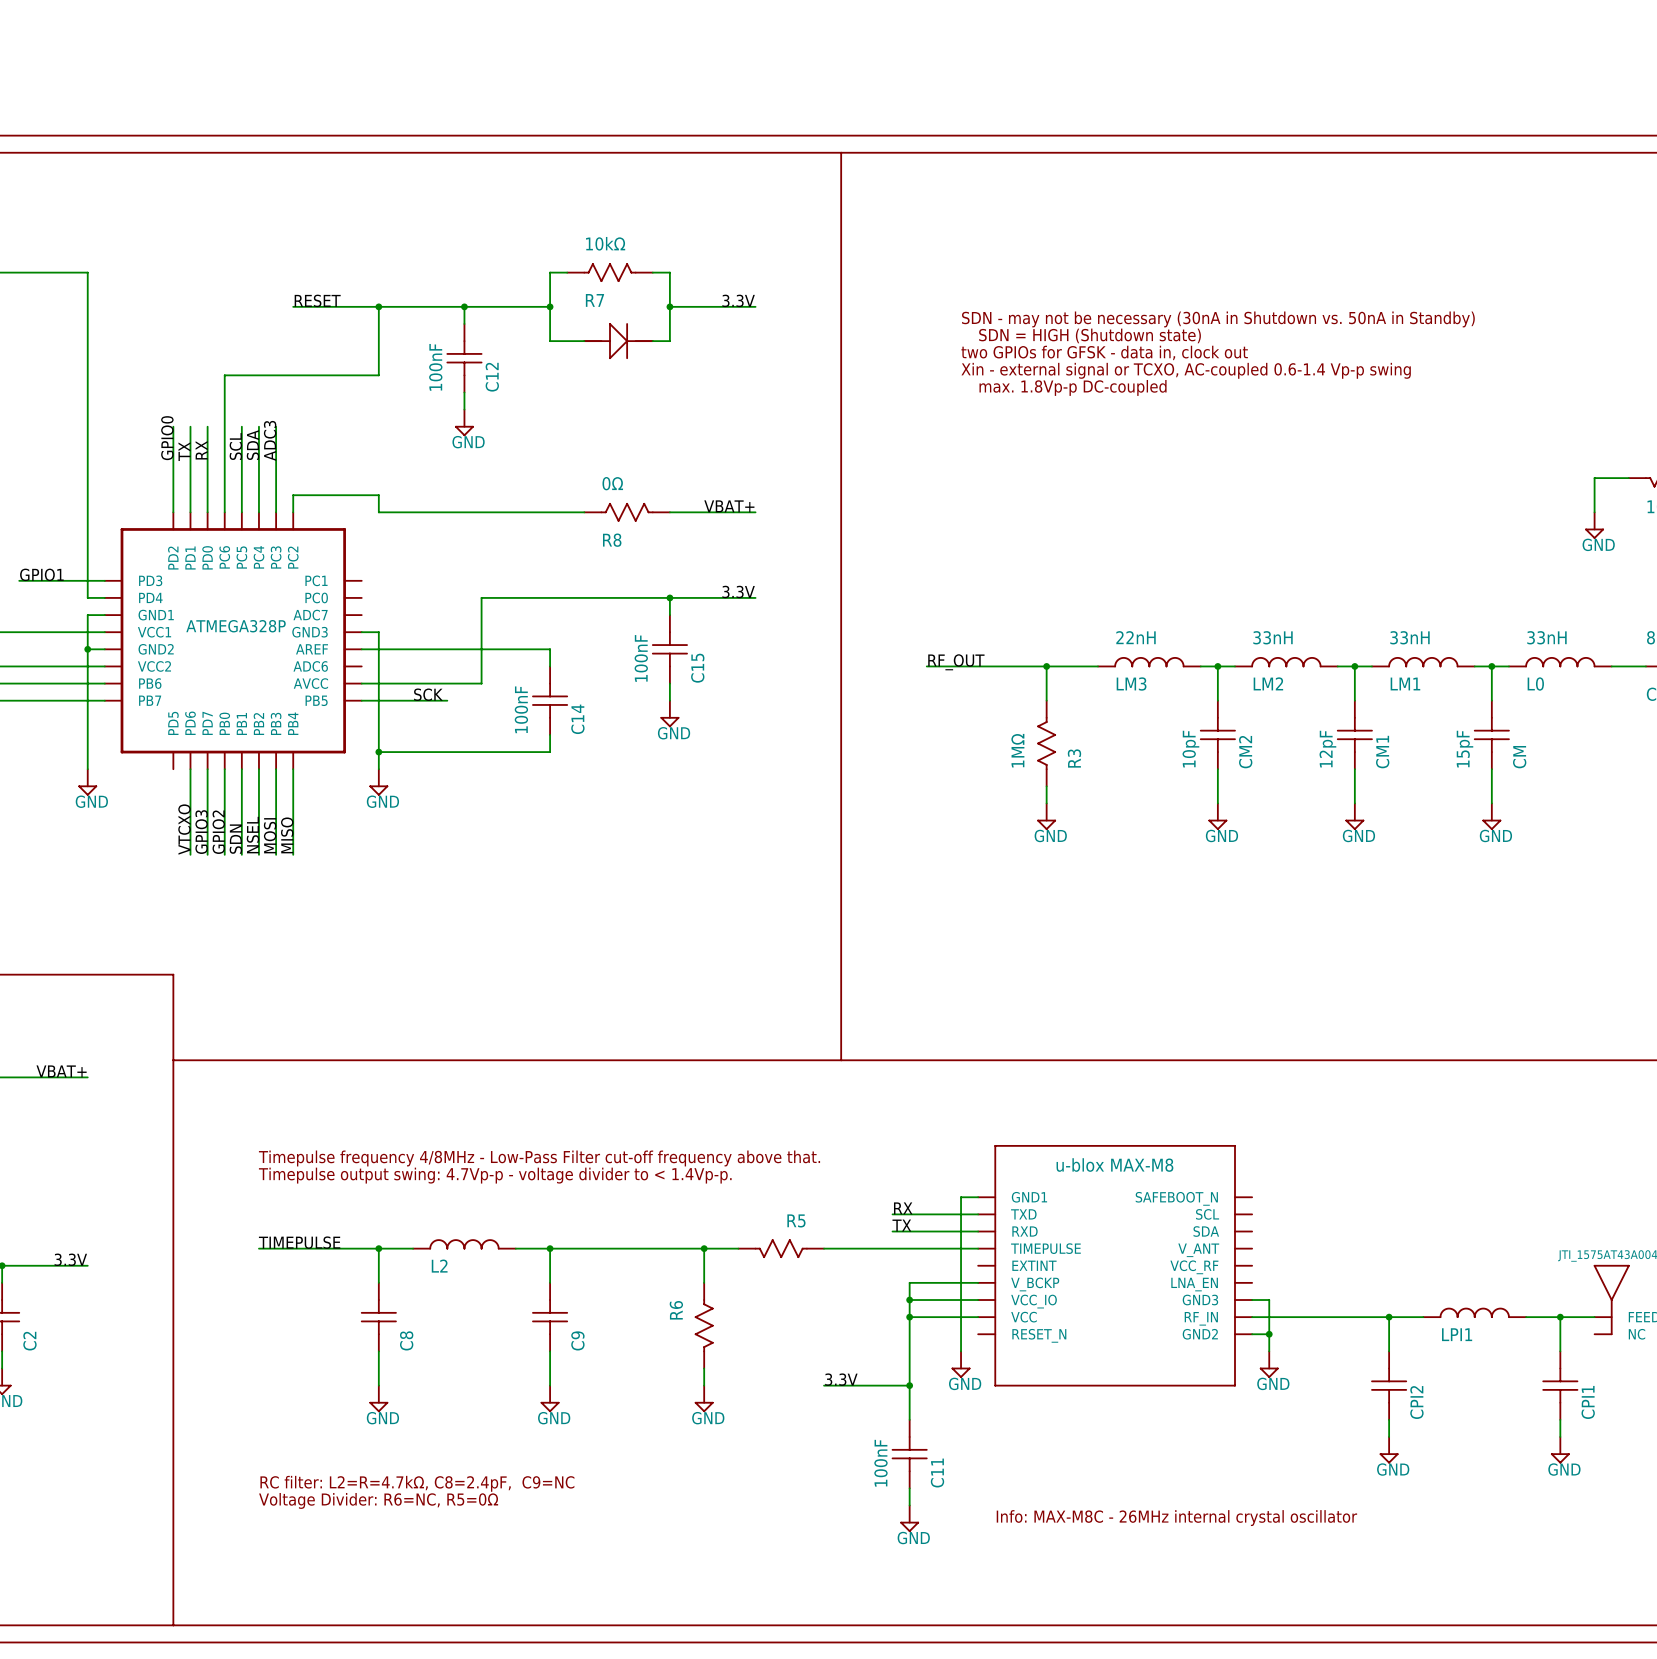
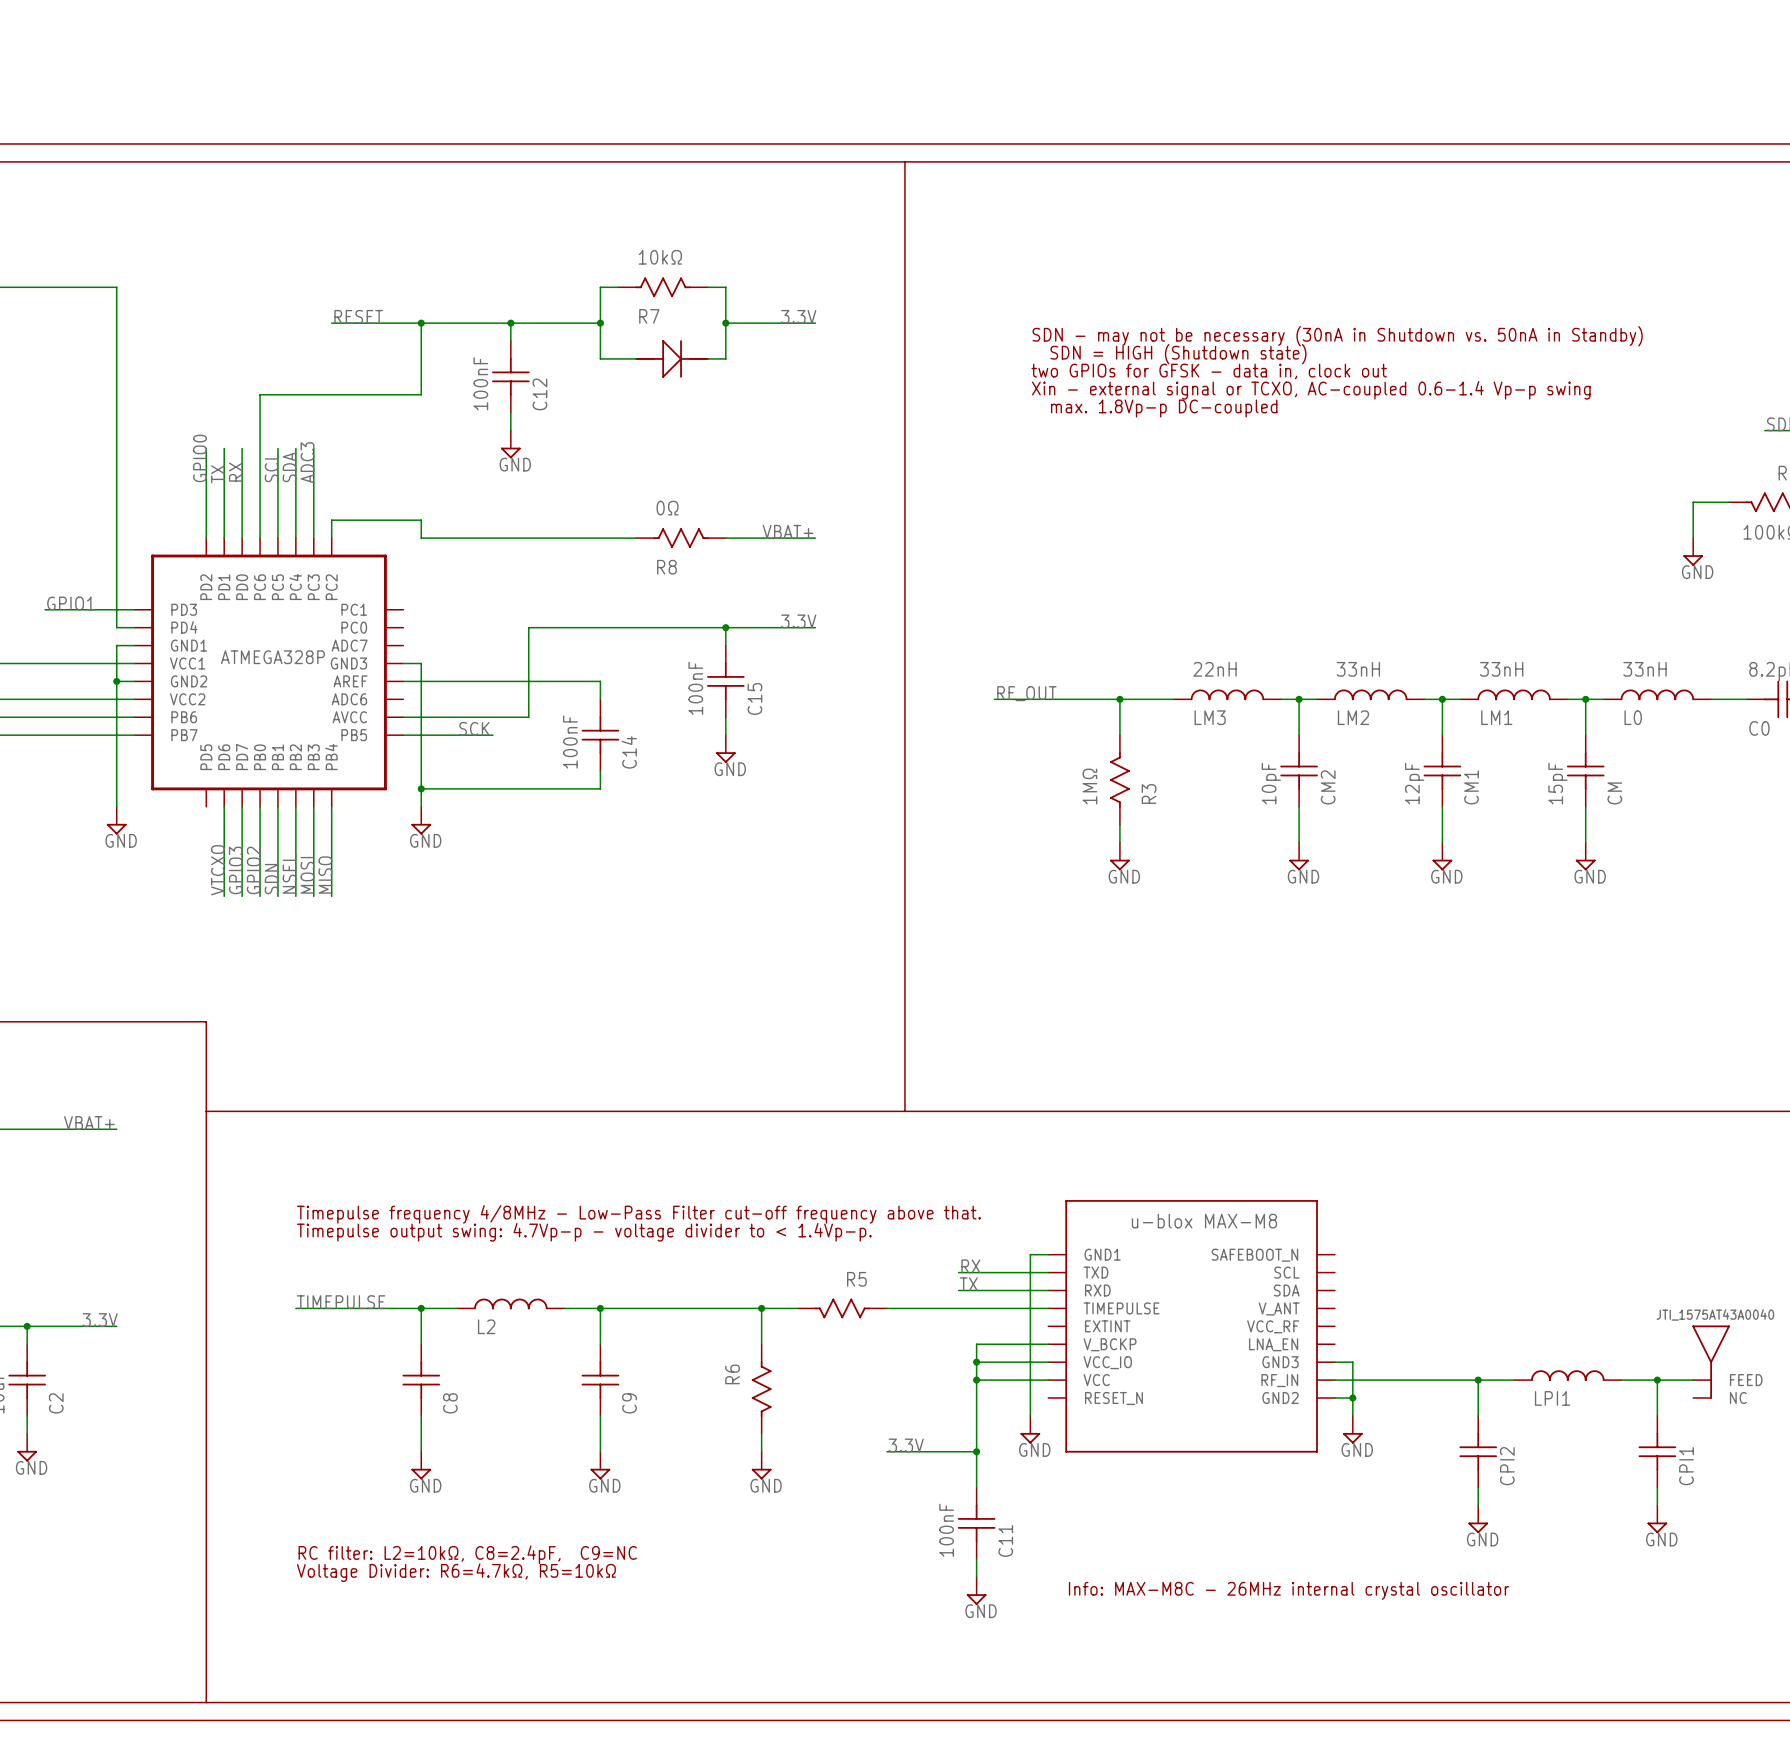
text: RC filter: L2=R=4.7kΩ, C8=2.4pF, C9=NC (417, 1483) -> RC filter: L2=10kΩ, C8=2.4pF, C9=NC (467, 1554)
text: Voltage Divider: R6=NC, R5=0Ω (378, 1500) -> Voltage Divider: R6=4.7kΩ, R5=10kΩ (456, 1572)

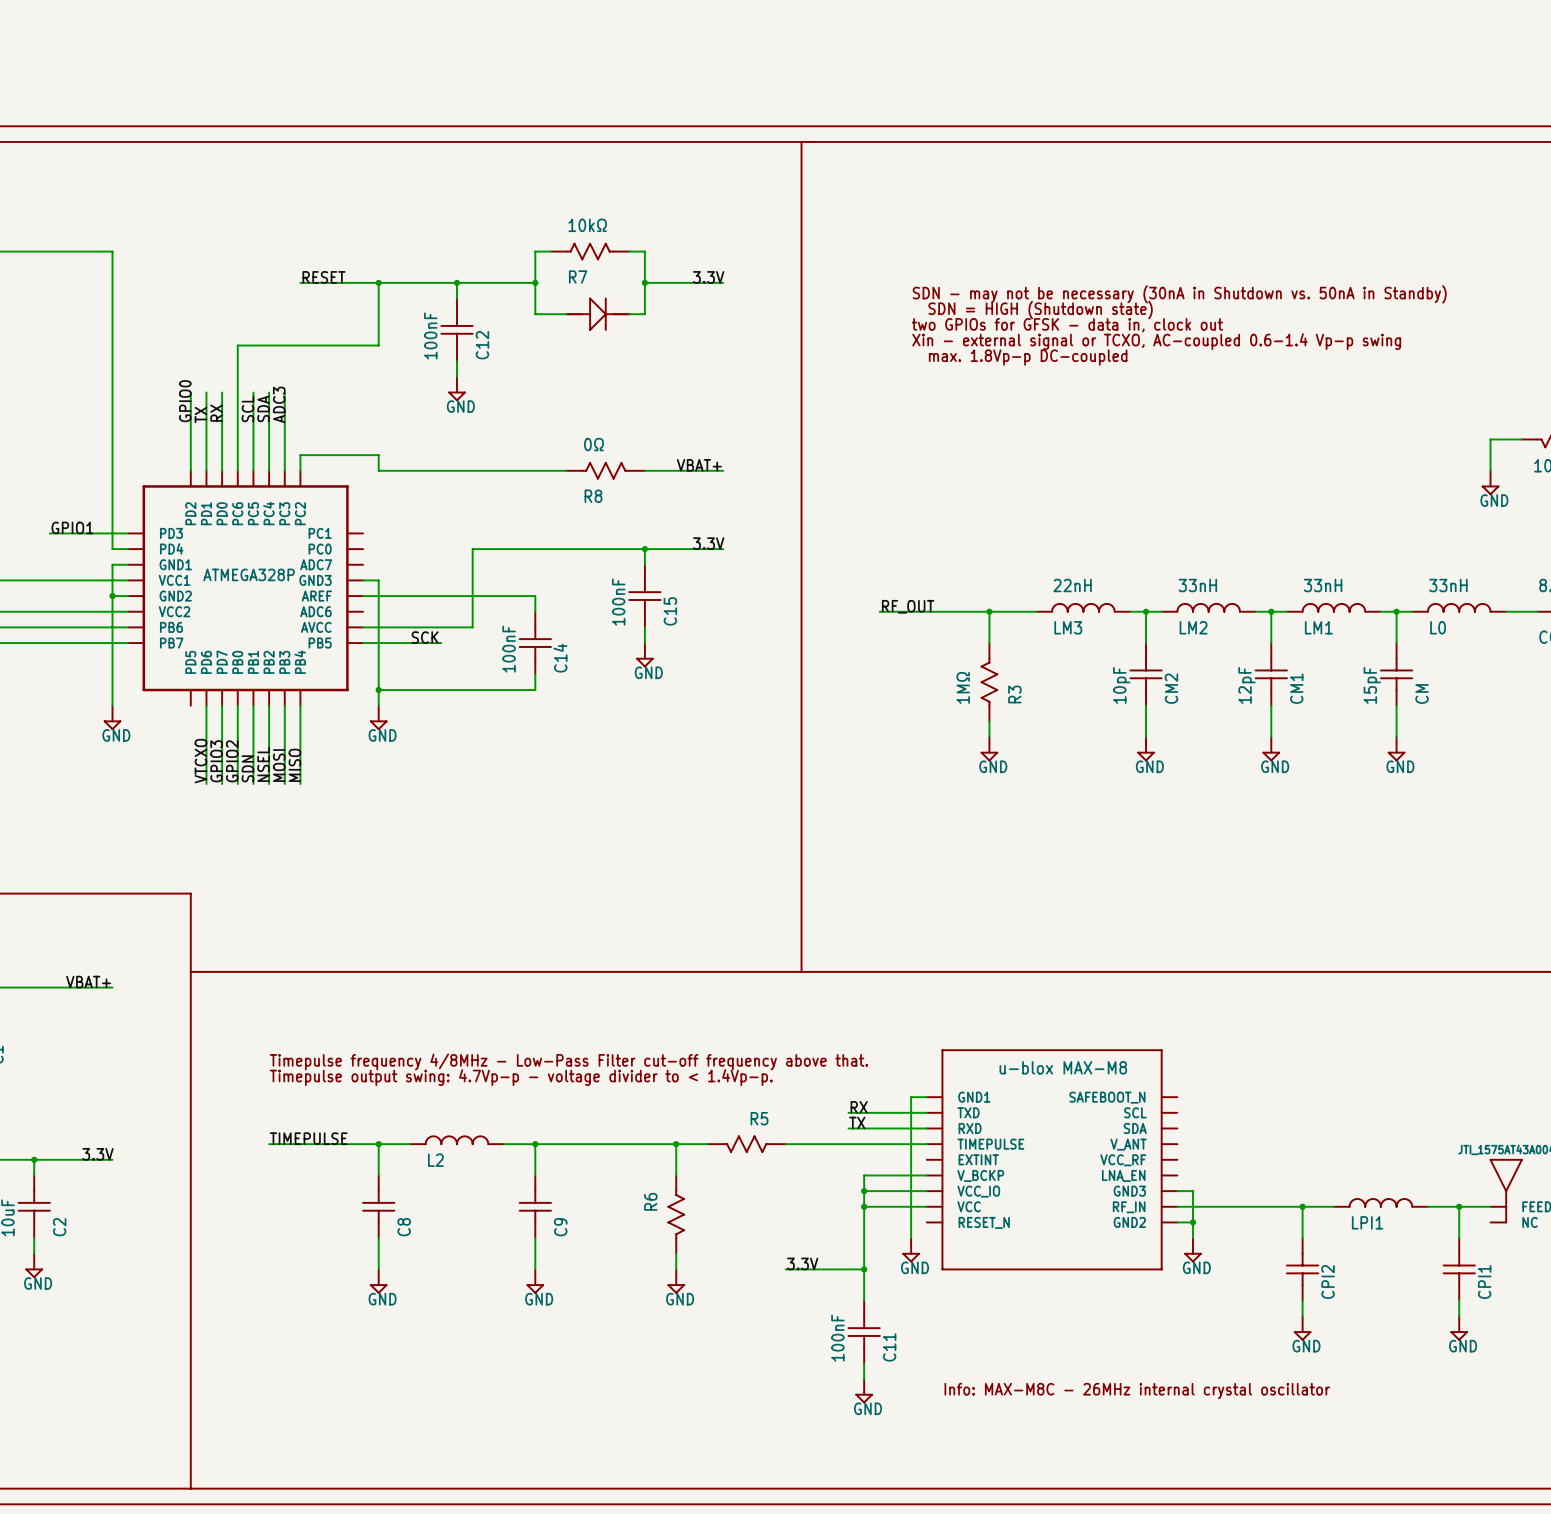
text: RC filter: L2=10kΩ, C8=2.4pF, C9=NC (467, 1554) -> none
text: Voltage Divider: R6=4.7kΩ, R5=10kΩ (456, 1572) -> none

